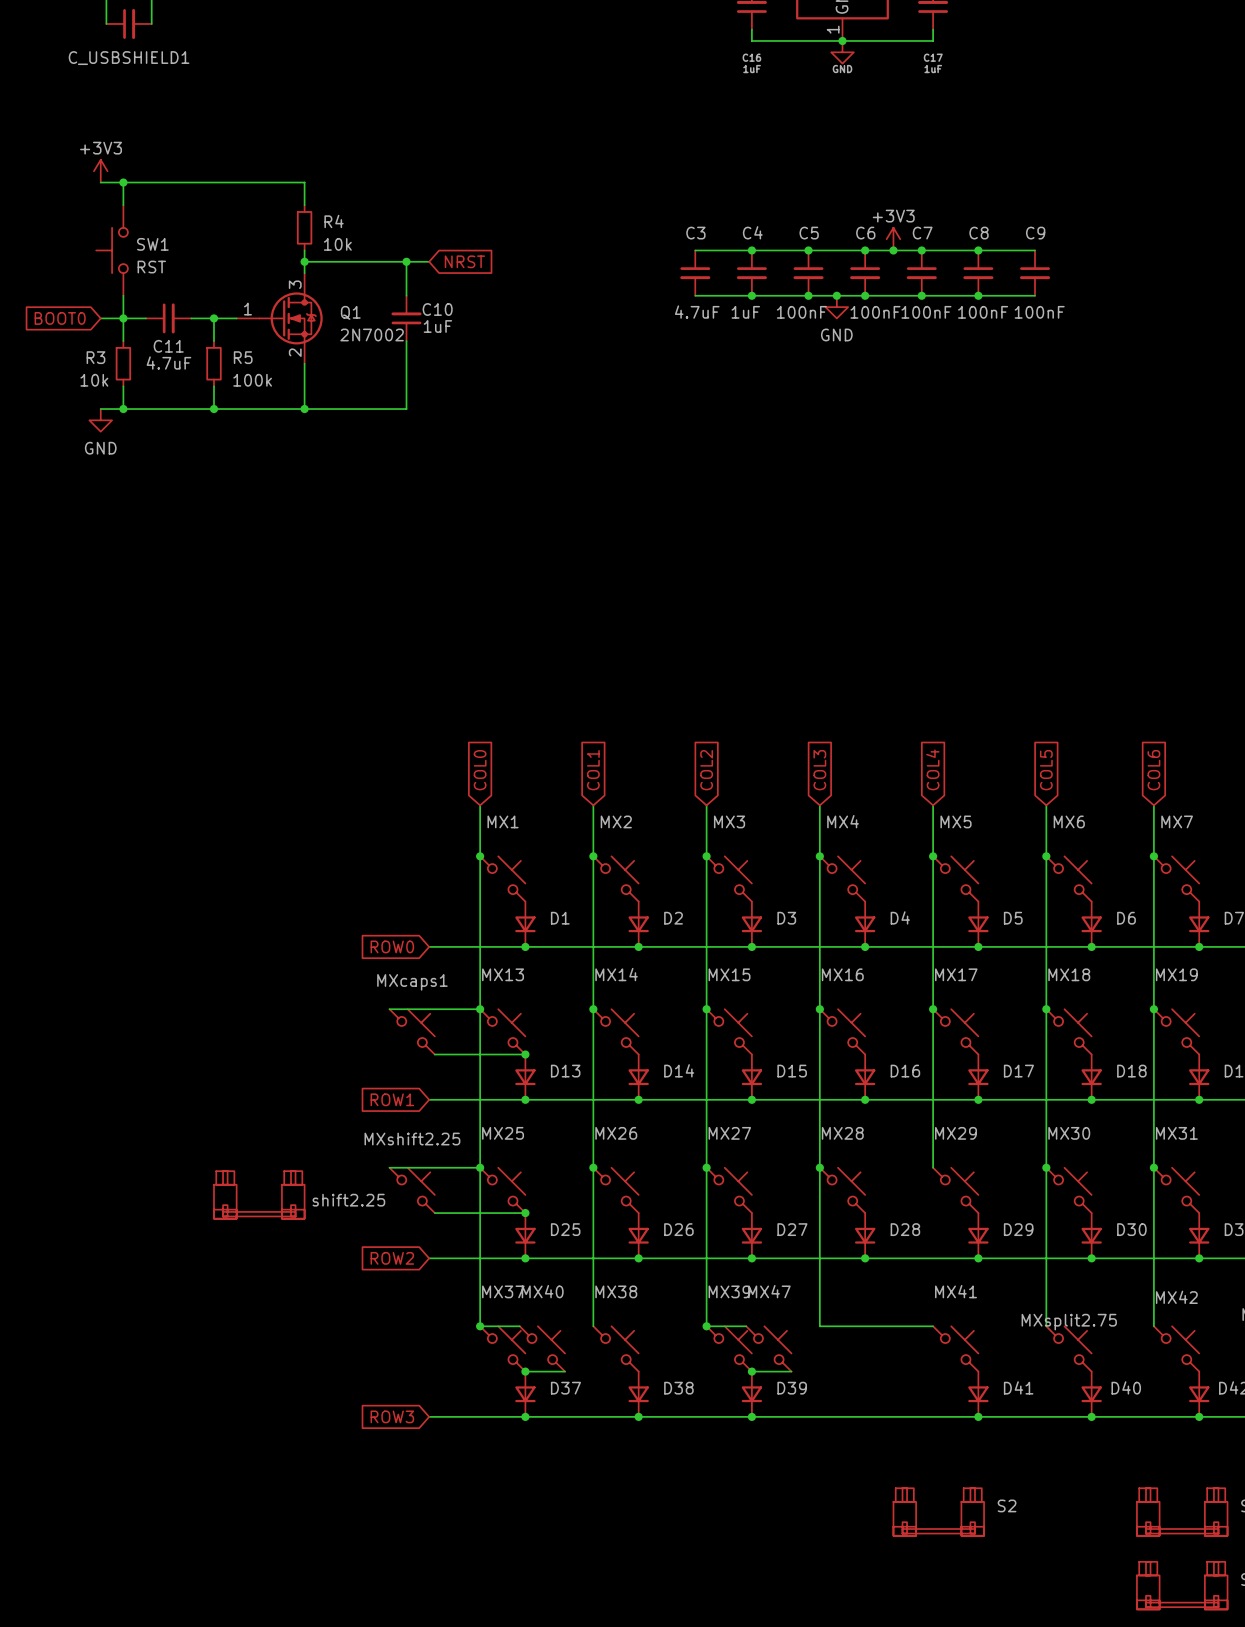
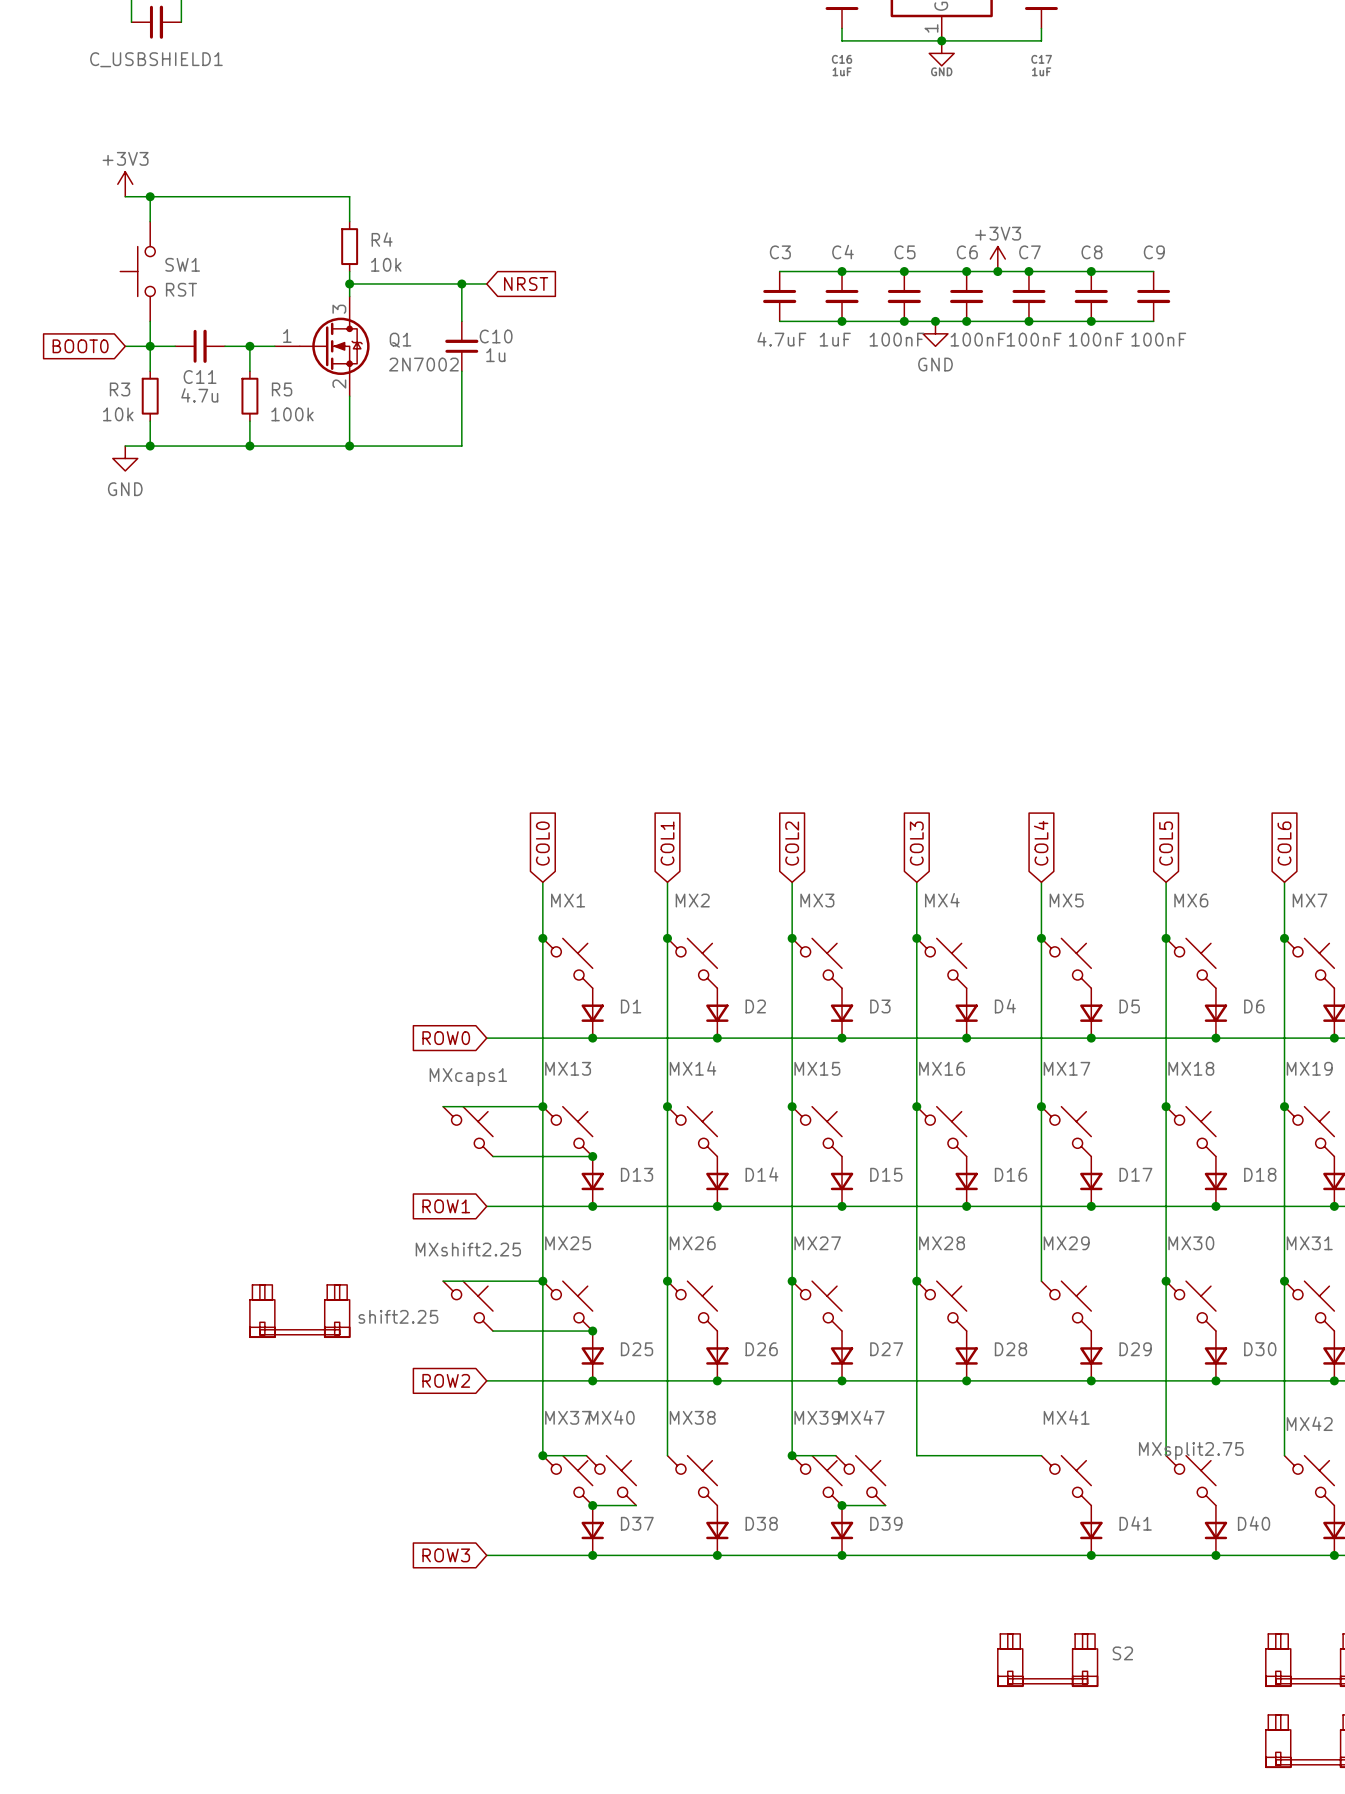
C10 value: 1uF (437, 326) -> 1u (495, 355)
C11 value: 4.7uF (168, 363) -> 4.7u (199, 395)

